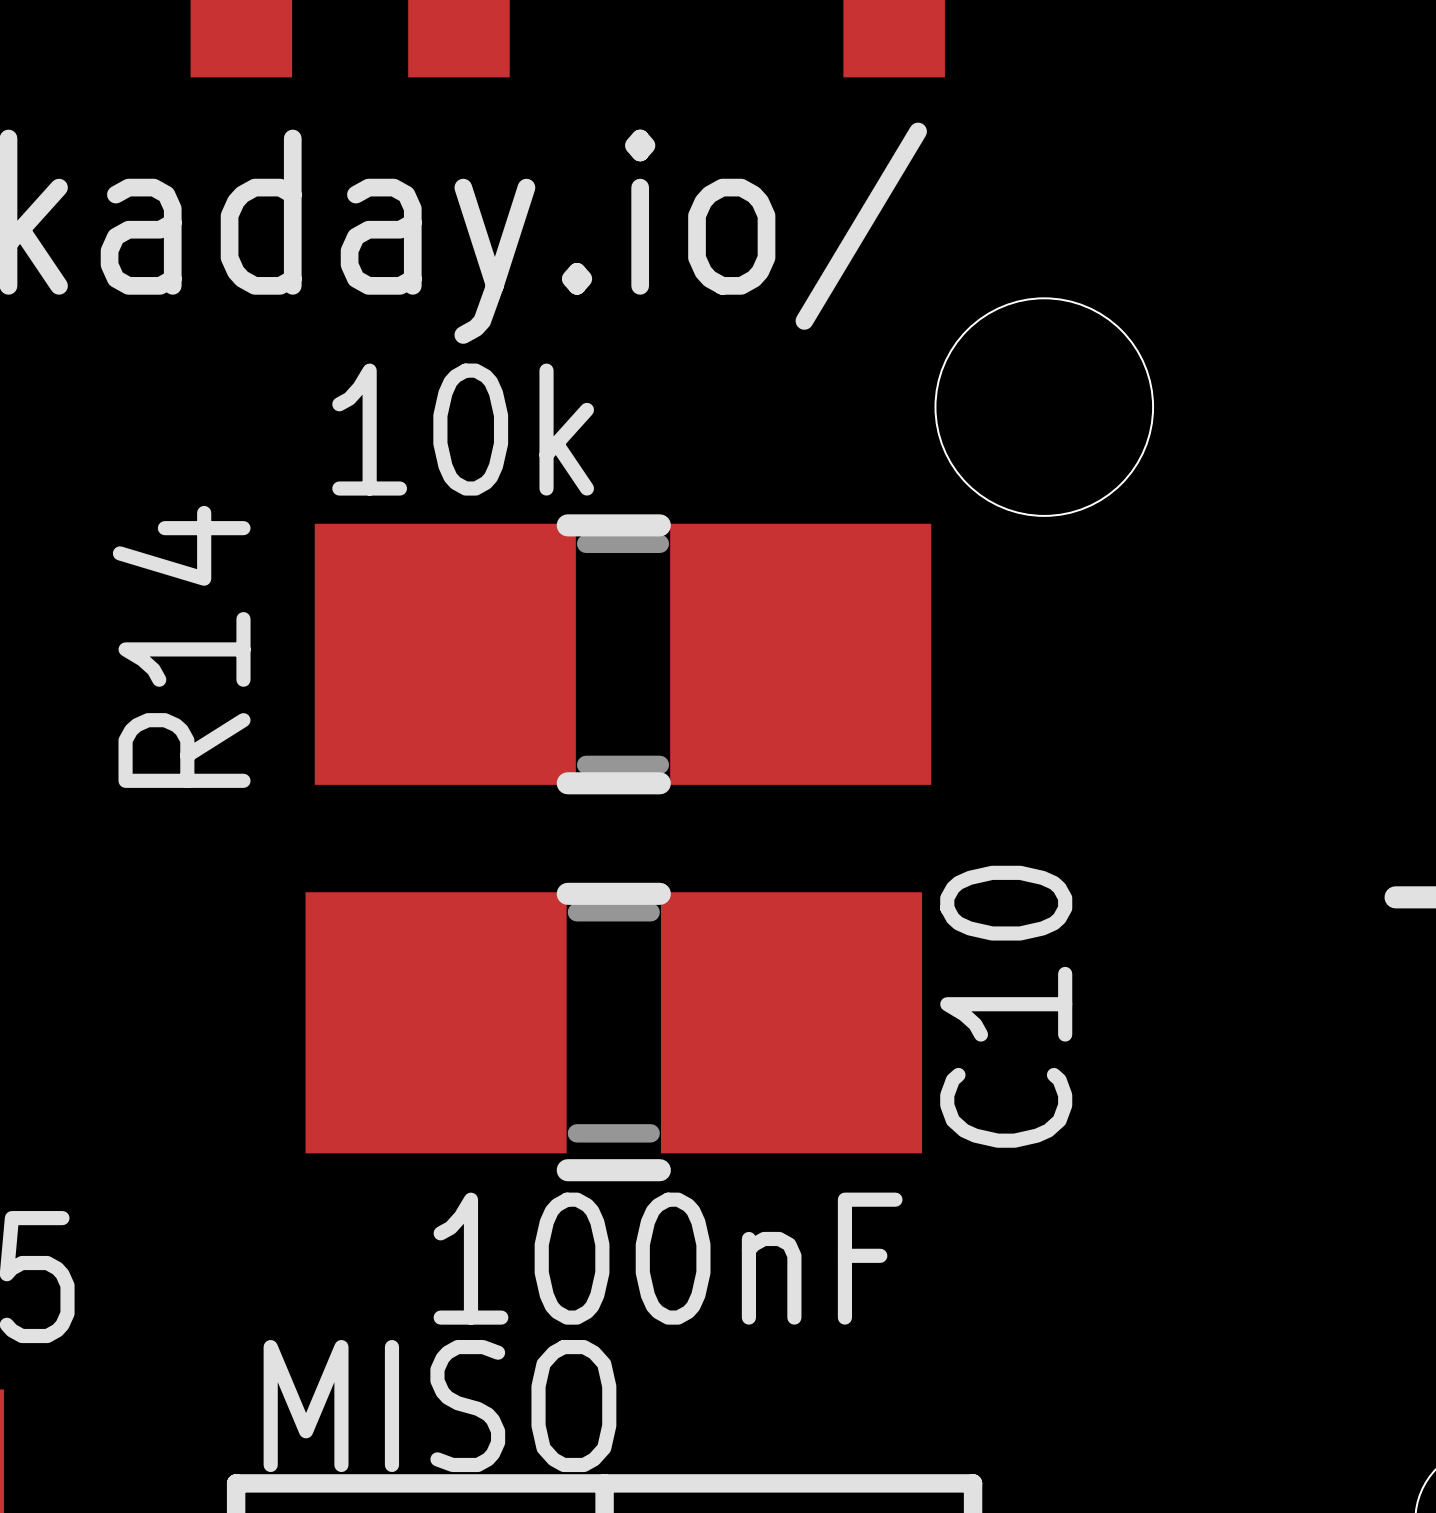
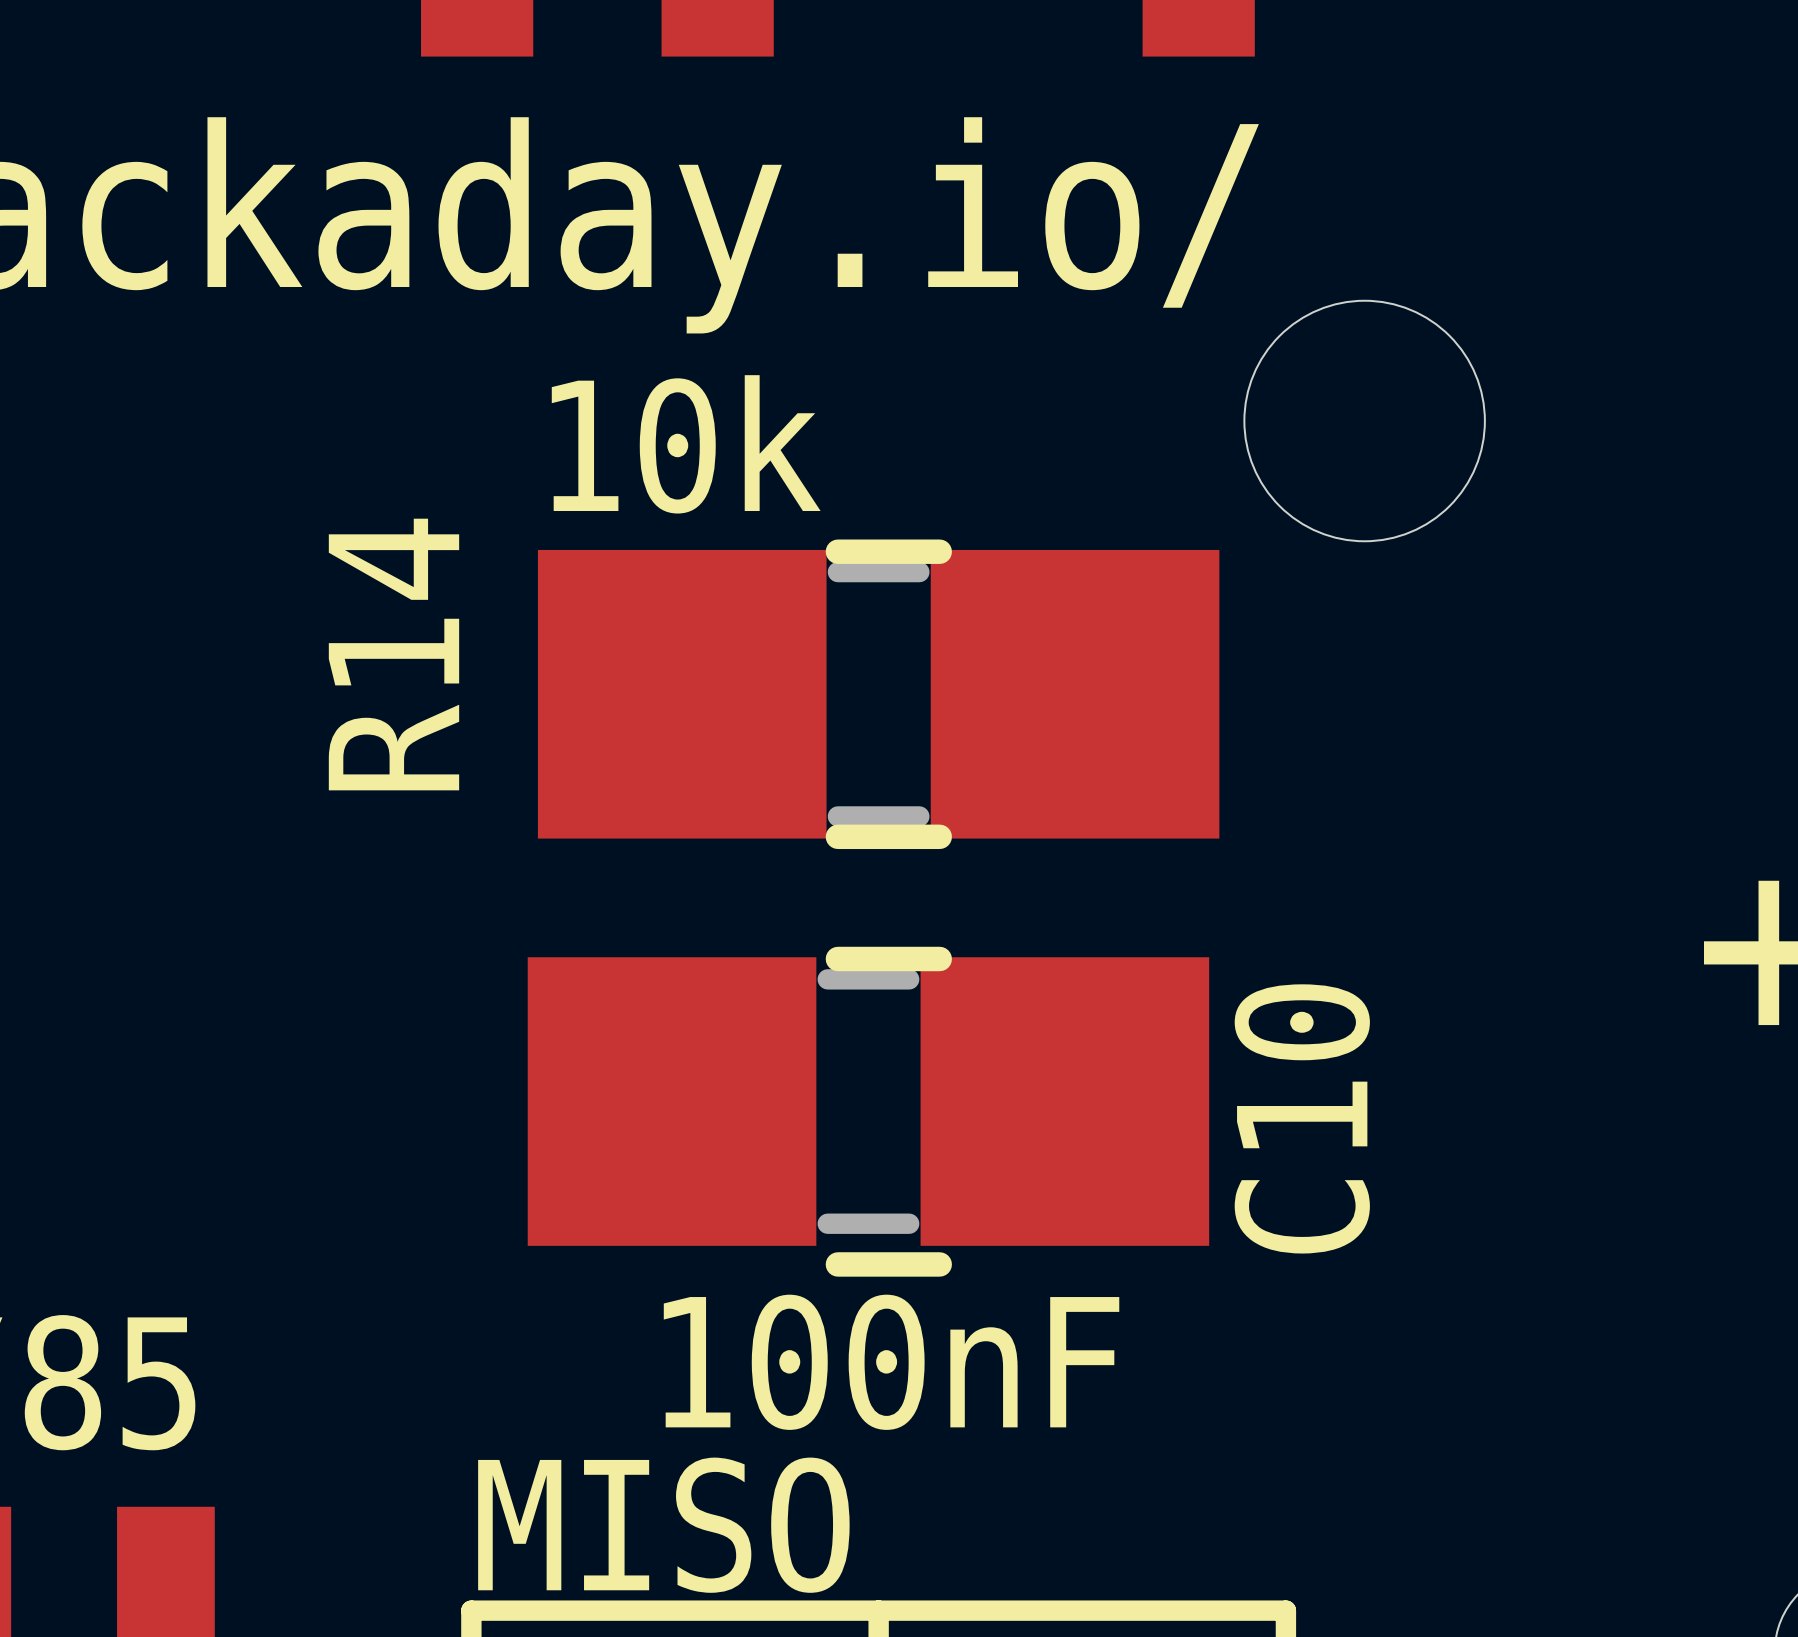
R14 position: (623, 654) -> (878, 694)
C10 position: (613, 1022) -> (868, 1101)

